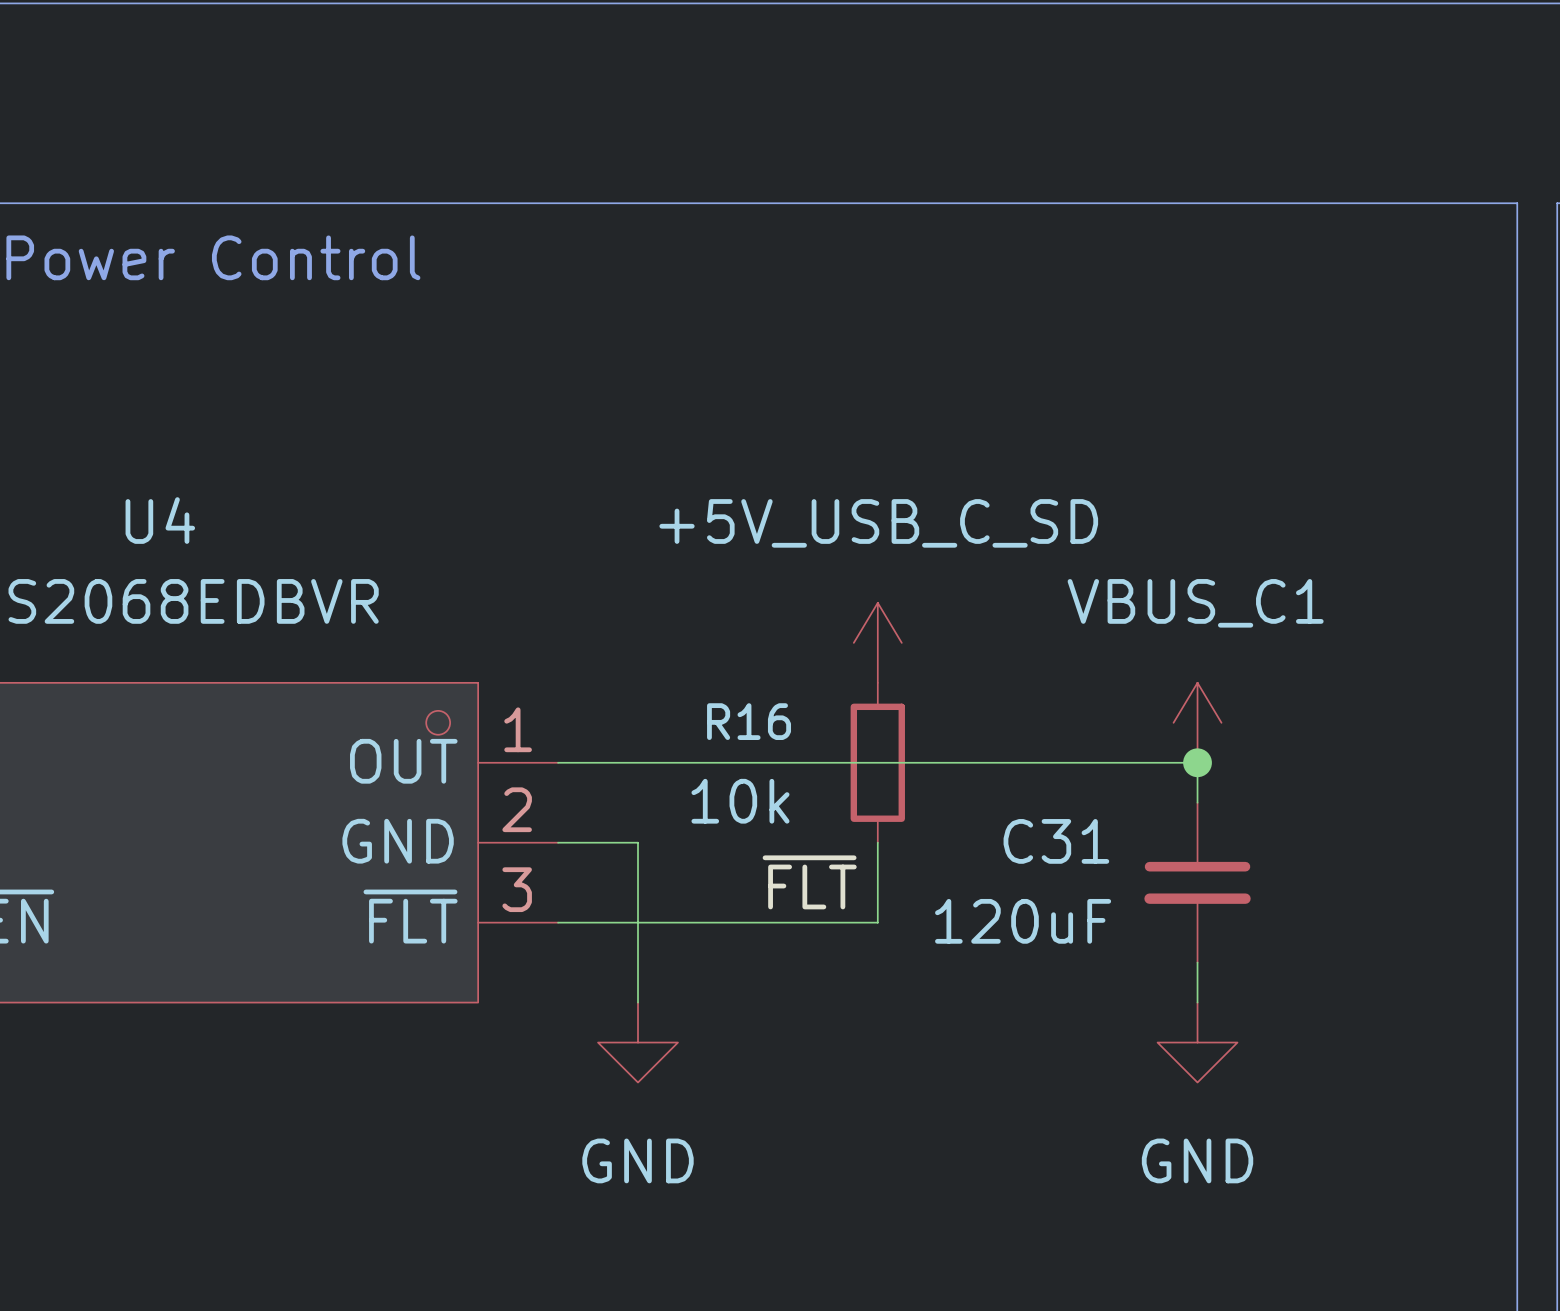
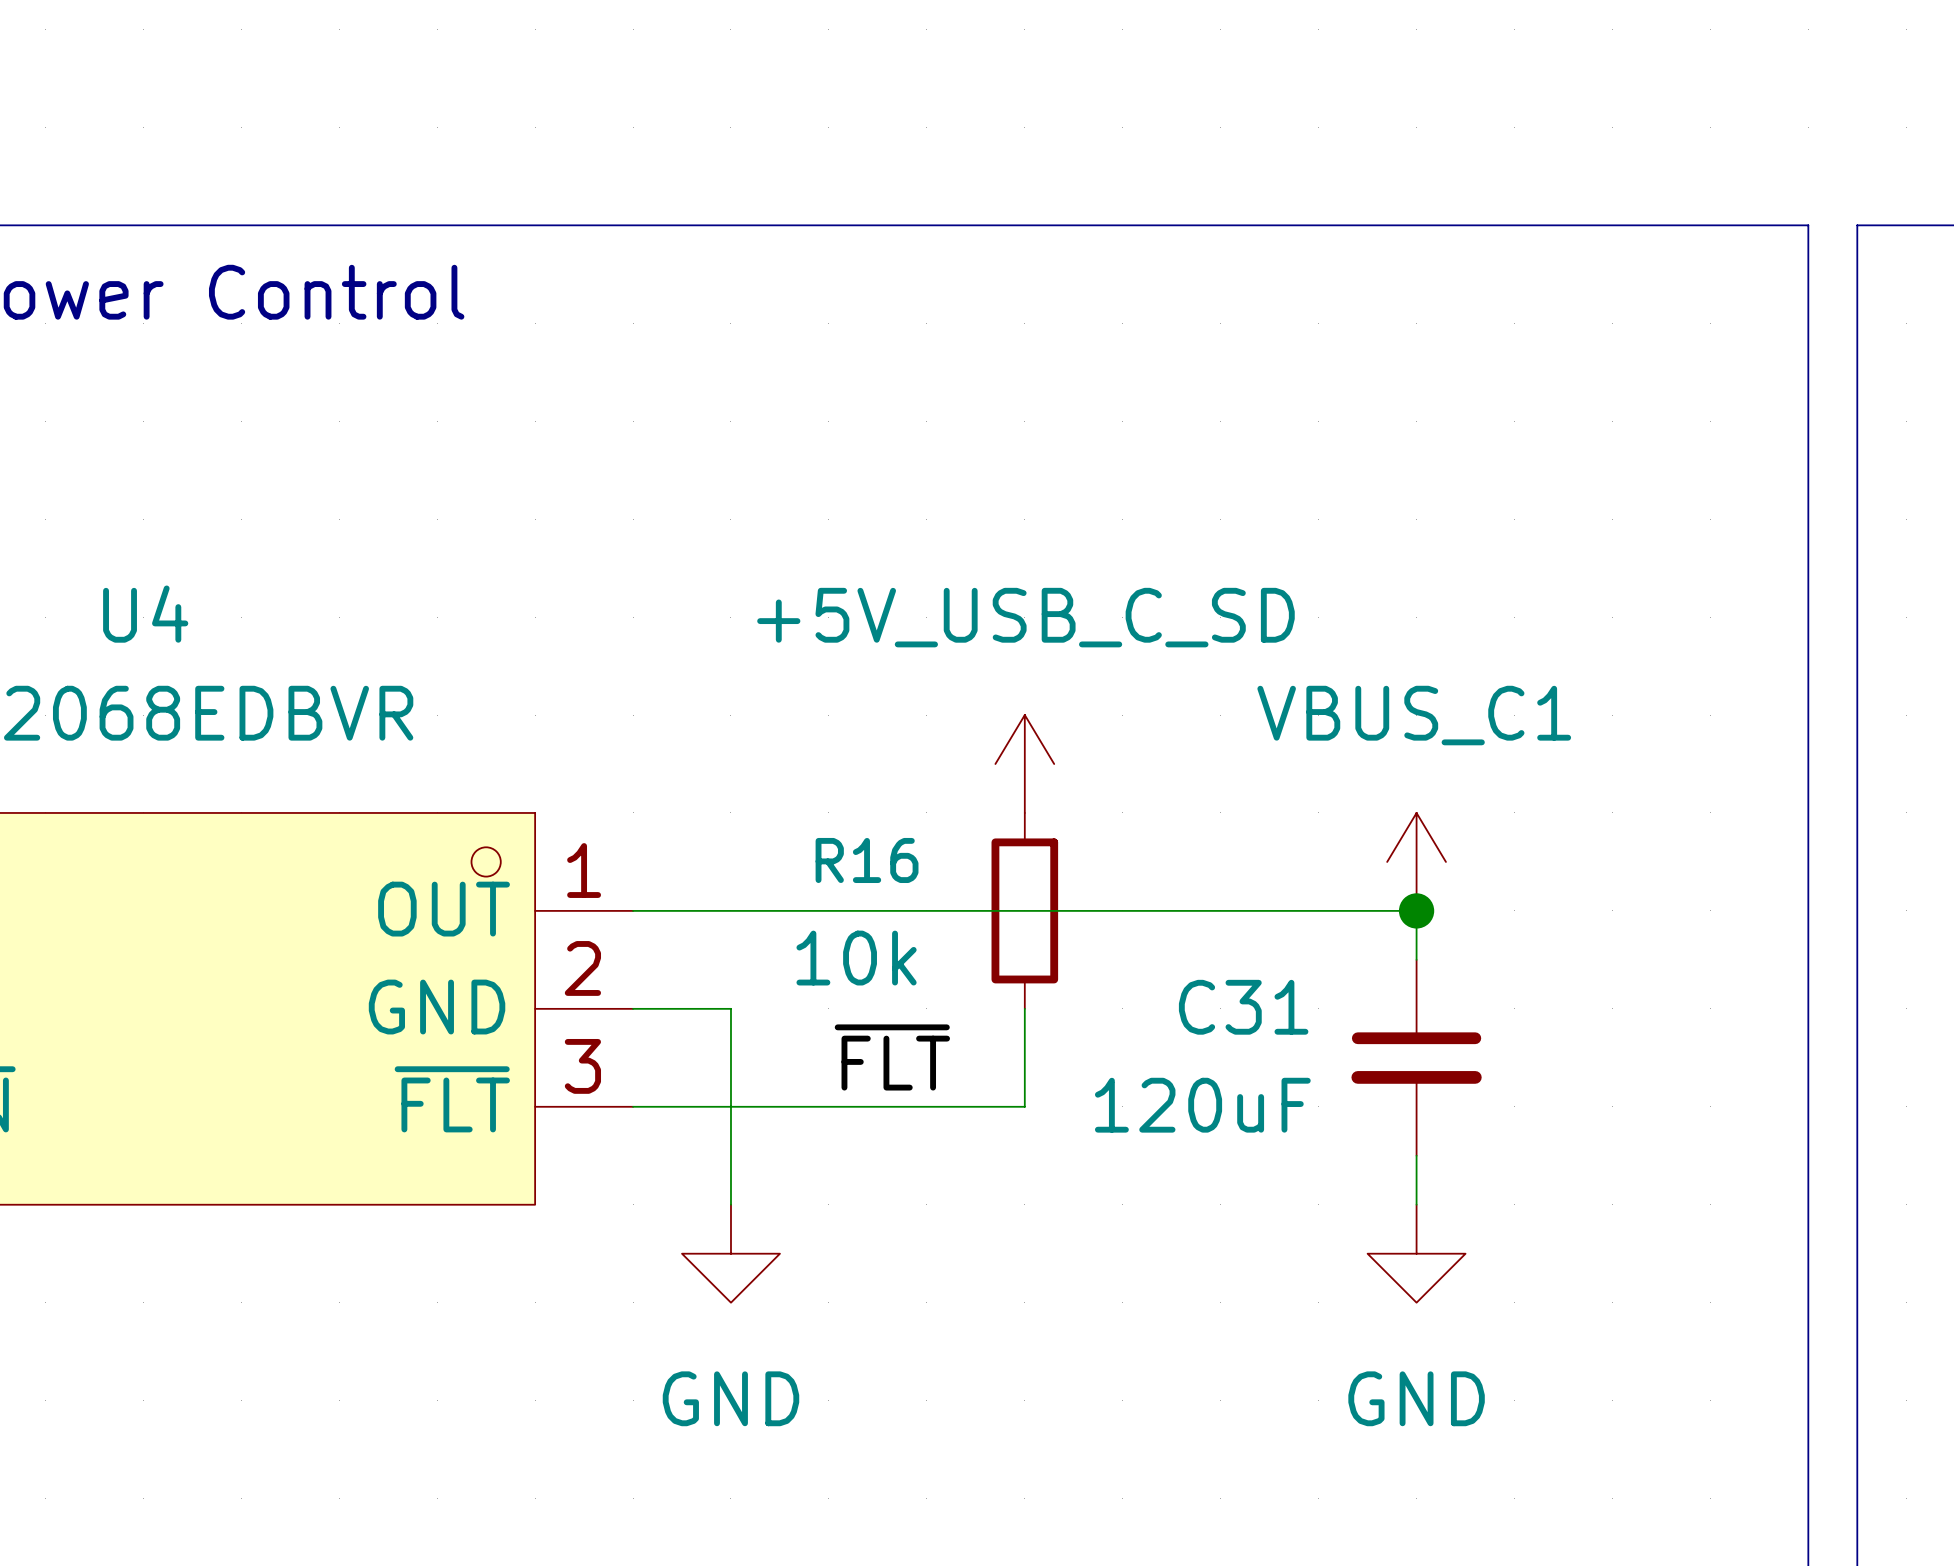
label position: ~{FLT} (809, 882) -> ~{FLT} (892, 1057)

